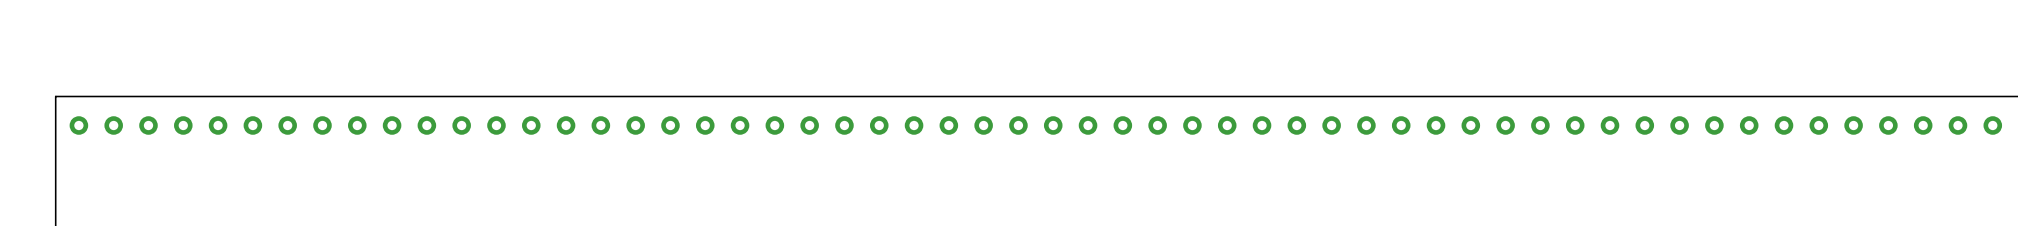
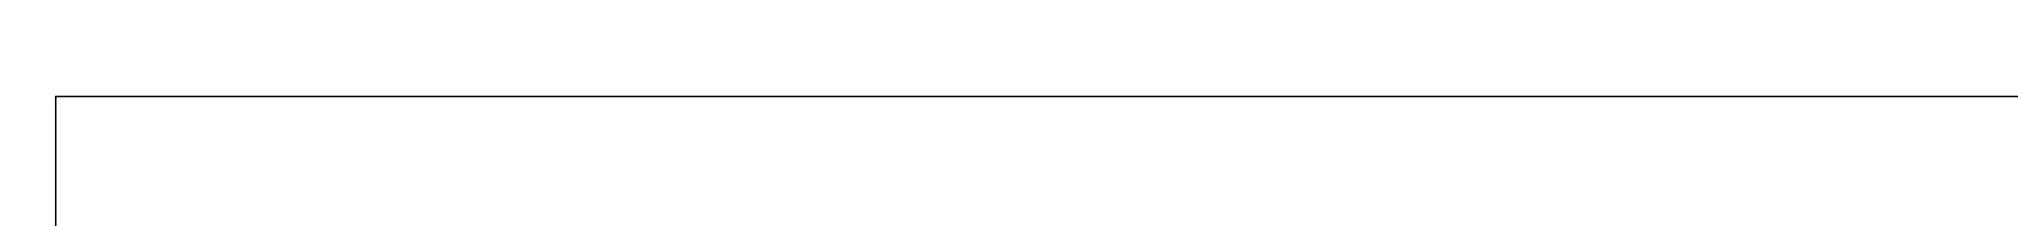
via: (78, 125) -> none
via: (113, 125) -> none
via: (148, 125) -> none
via: (183, 125) -> none
via: (218, 125) -> none
via: (252, 125) -> none
via: (287, 125) -> none
via: (322, 125) -> none
via: (357, 125) -> none
via: (392, 125) -> none
via: (426, 125) -> none
via: (461, 125) -> none
via: (496, 125) -> none
via: (531, 125) -> none
via: (566, 125) -> none
via: (600, 125) -> none
via: (635, 125) -> none
via: (670, 125) -> none
via: (705, 125) -> none
via: (740, 125) -> none
via: (774, 125) -> none
via: (809, 125) -> none
via: (844, 125) -> none
via: (879, 125) -> none
via: (914, 125) -> none
via: (948, 125) -> none
via: (983, 125) -> none
via: (1018, 125) -> none
via: (1053, 125) -> none
via: (1088, 125) -> none
via: (1122, 125) -> none
via: (1157, 125) -> none
via: (1192, 125) -> none
via: (1227, 125) -> none
via: (1262, 125) -> none
via: (1296, 125) -> none
via: (1331, 125) -> none
via: (1366, 125) -> none
via: (1401, 125) -> none
via: (1436, 125) -> none
via: (1470, 125) -> none
via: (1505, 125) -> none
via: (1540, 125) -> none
via: (1575, 125) -> none
via: (1610, 125) -> none
via: (1644, 125) -> none
via: (1679, 125) -> none
via: (1714, 125) -> none
via: (1749, 125) -> none
via: (1783, 125) -> none
via: (1818, 125) -> none
via: (1853, 125) -> none
via: (1888, 125) -> none
via: (1923, 125) -> none
via: (1957, 125) -> none
via: (1992, 125) -> none

